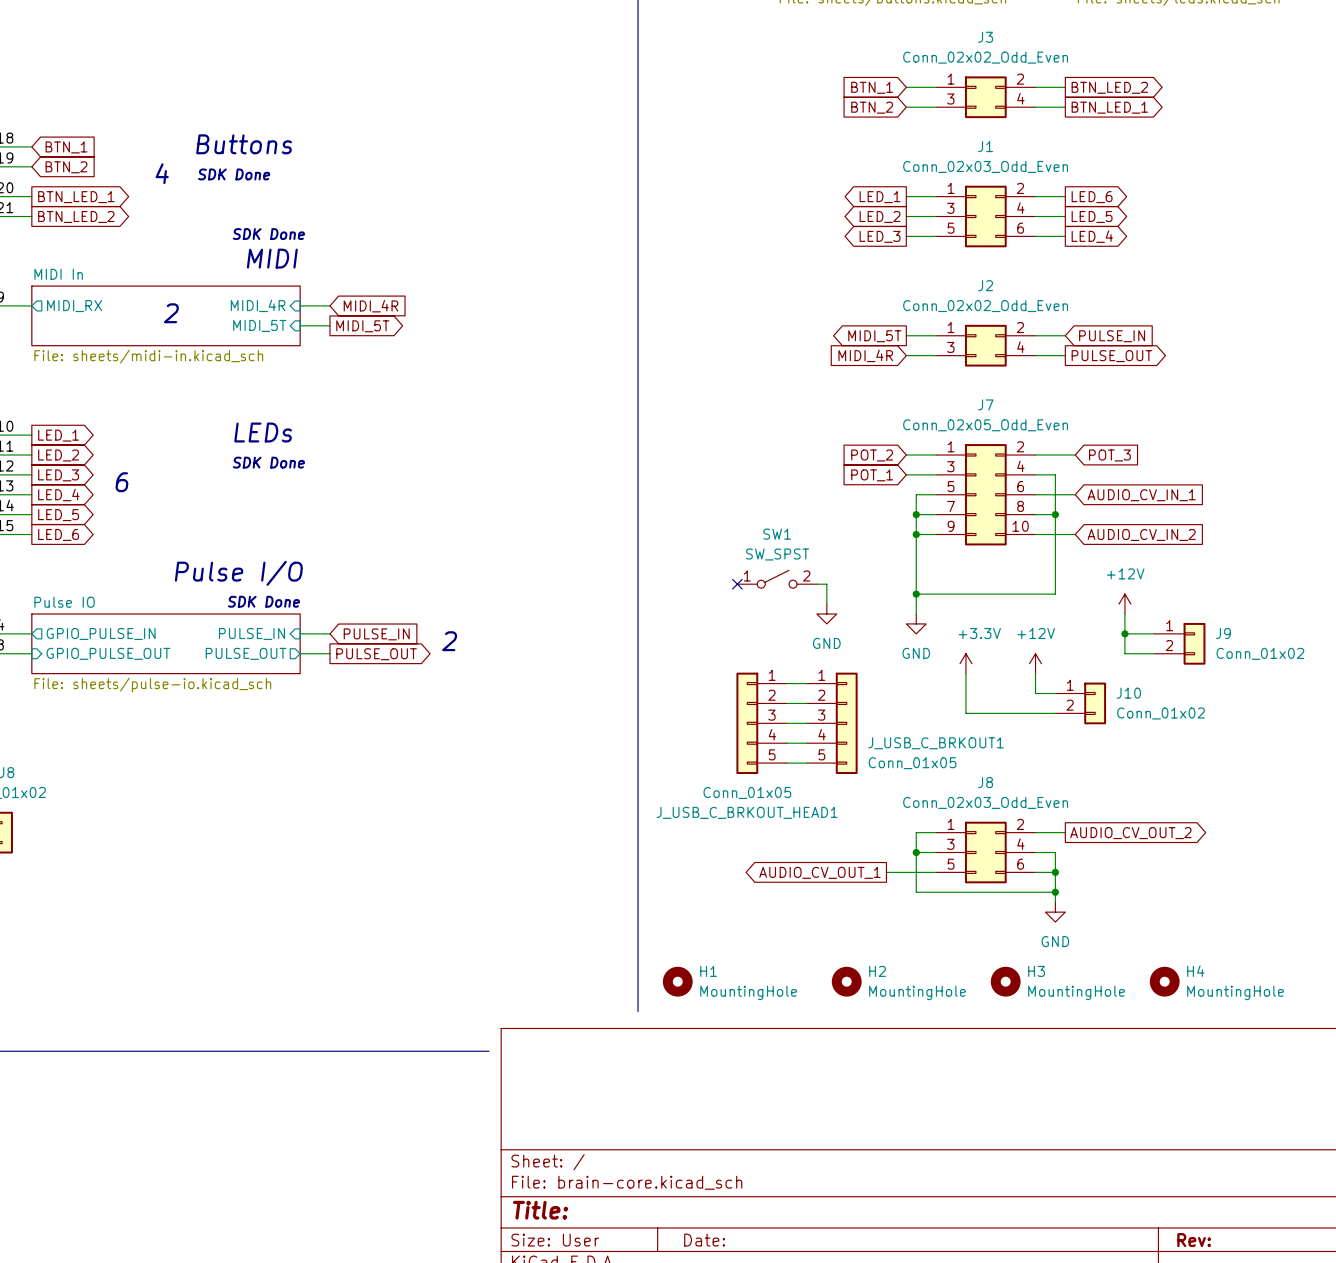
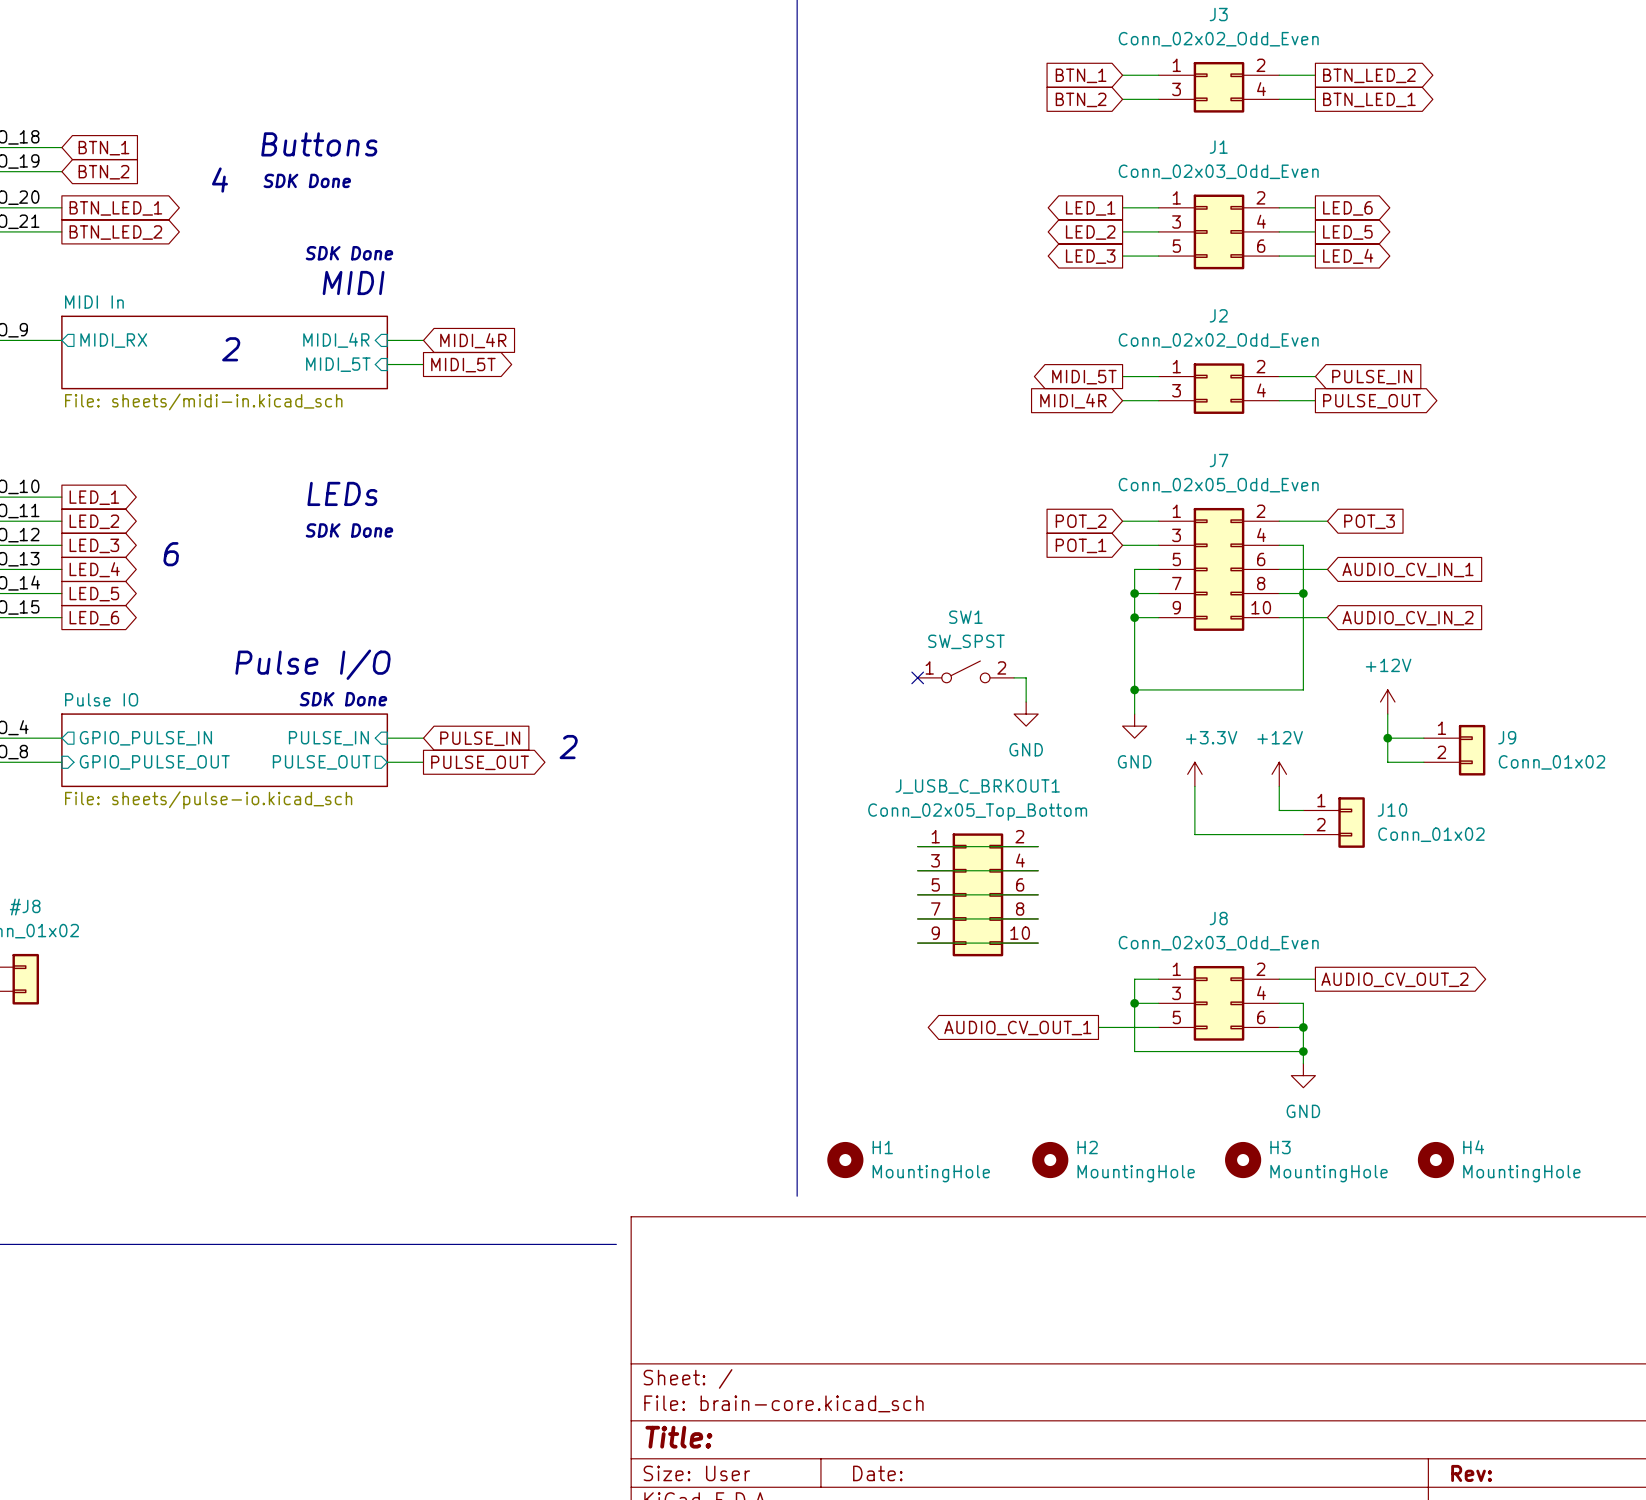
J_USB_C_BRKOUT1 symbol: [806, 672, 858, 775] -> [917, 833, 1039, 957]
wire: (787, 683) (806, 683) -> none
wire: (787, 703) (806, 703) -> none
J_USB_C_BRKOUT_HEAD1: Conn_01x05 (761, 723) -> none
J_USB_C_BRKOUT1 name position: J_USB_C_BRKOUT1 (935, 743) -> J_USB_C_BRKOUT1 (977, 786)
J_USB_C_BRKOUT1 value: Conn_01x05 (912, 763) -> Conn_02x05_Top_Bottom (977, 812)
wire: none -> (917, 918) (1038, 918)
wire: none -> (917, 943) (1038, 943)

